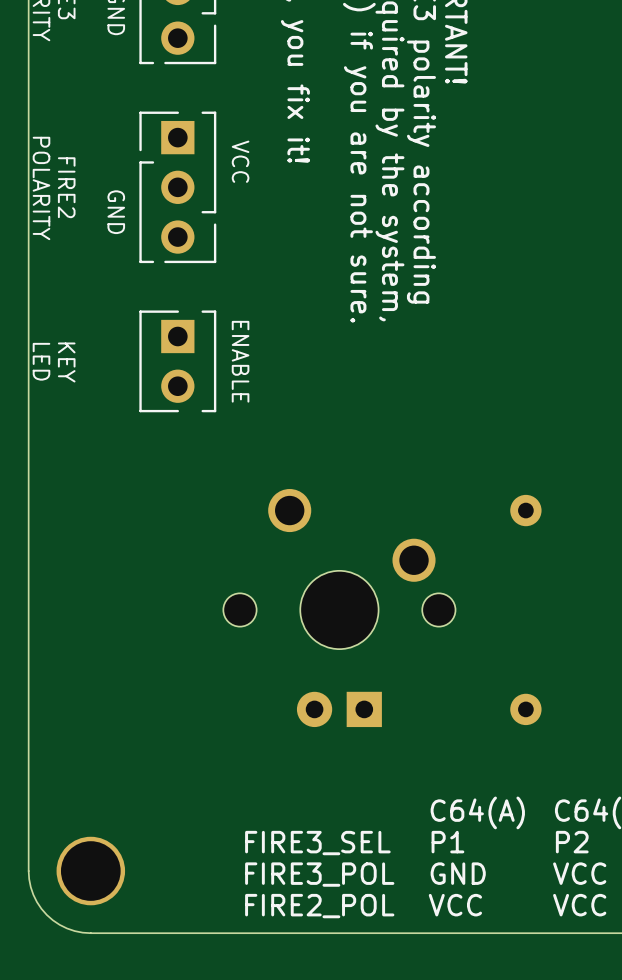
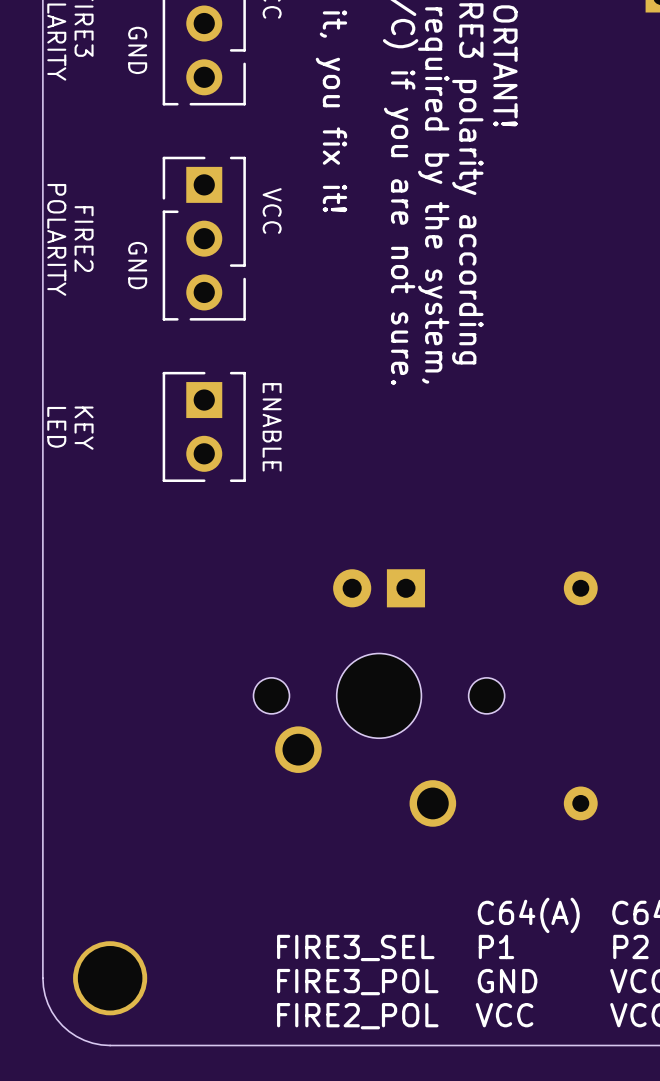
part rotation: 0° (339, 569) -> 180° (379, 740)
part position: (339, 709) -> (379, 588)

